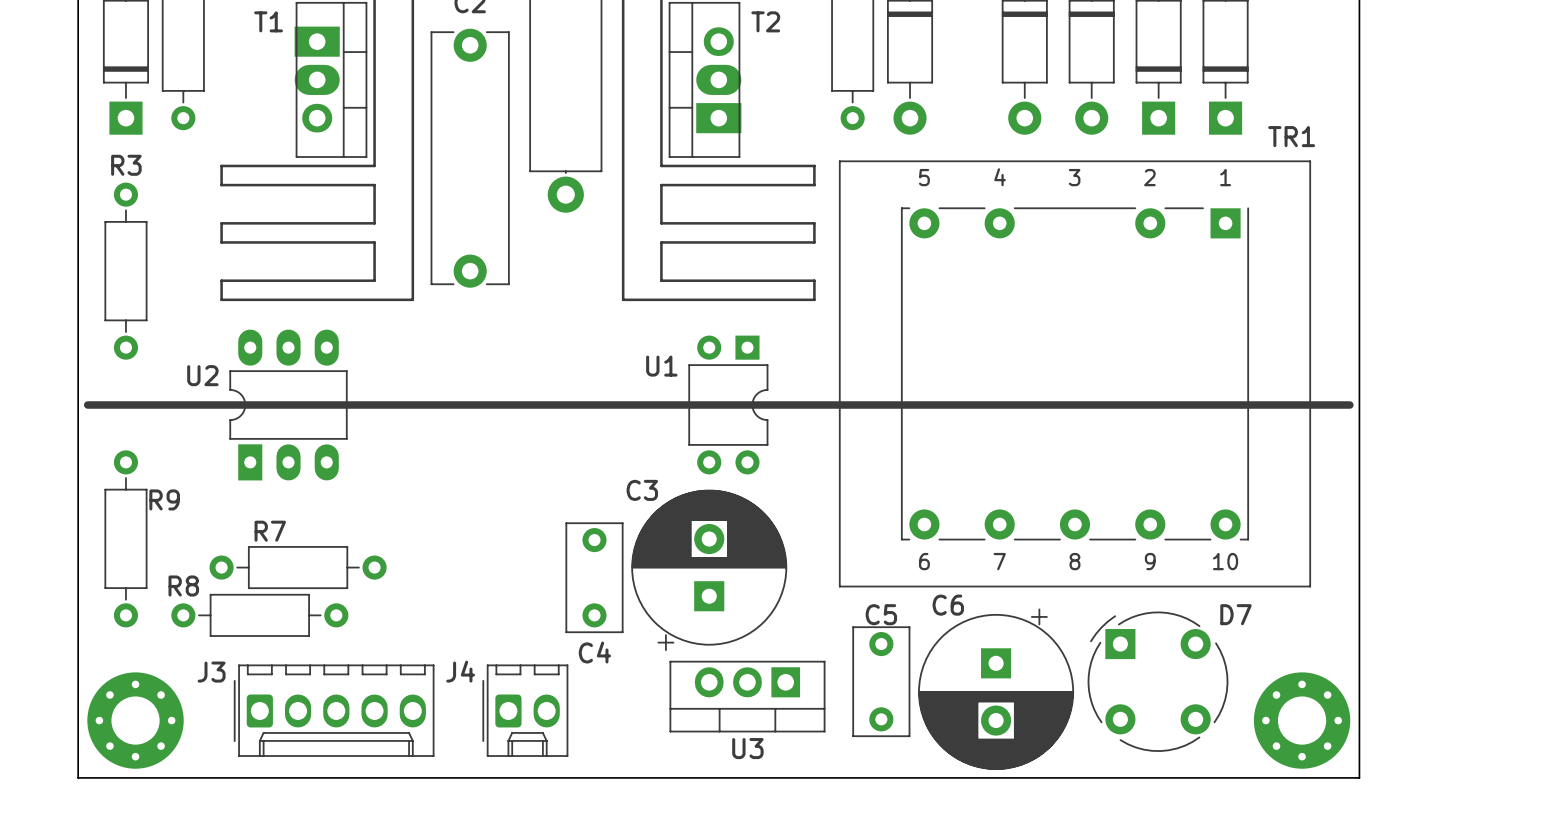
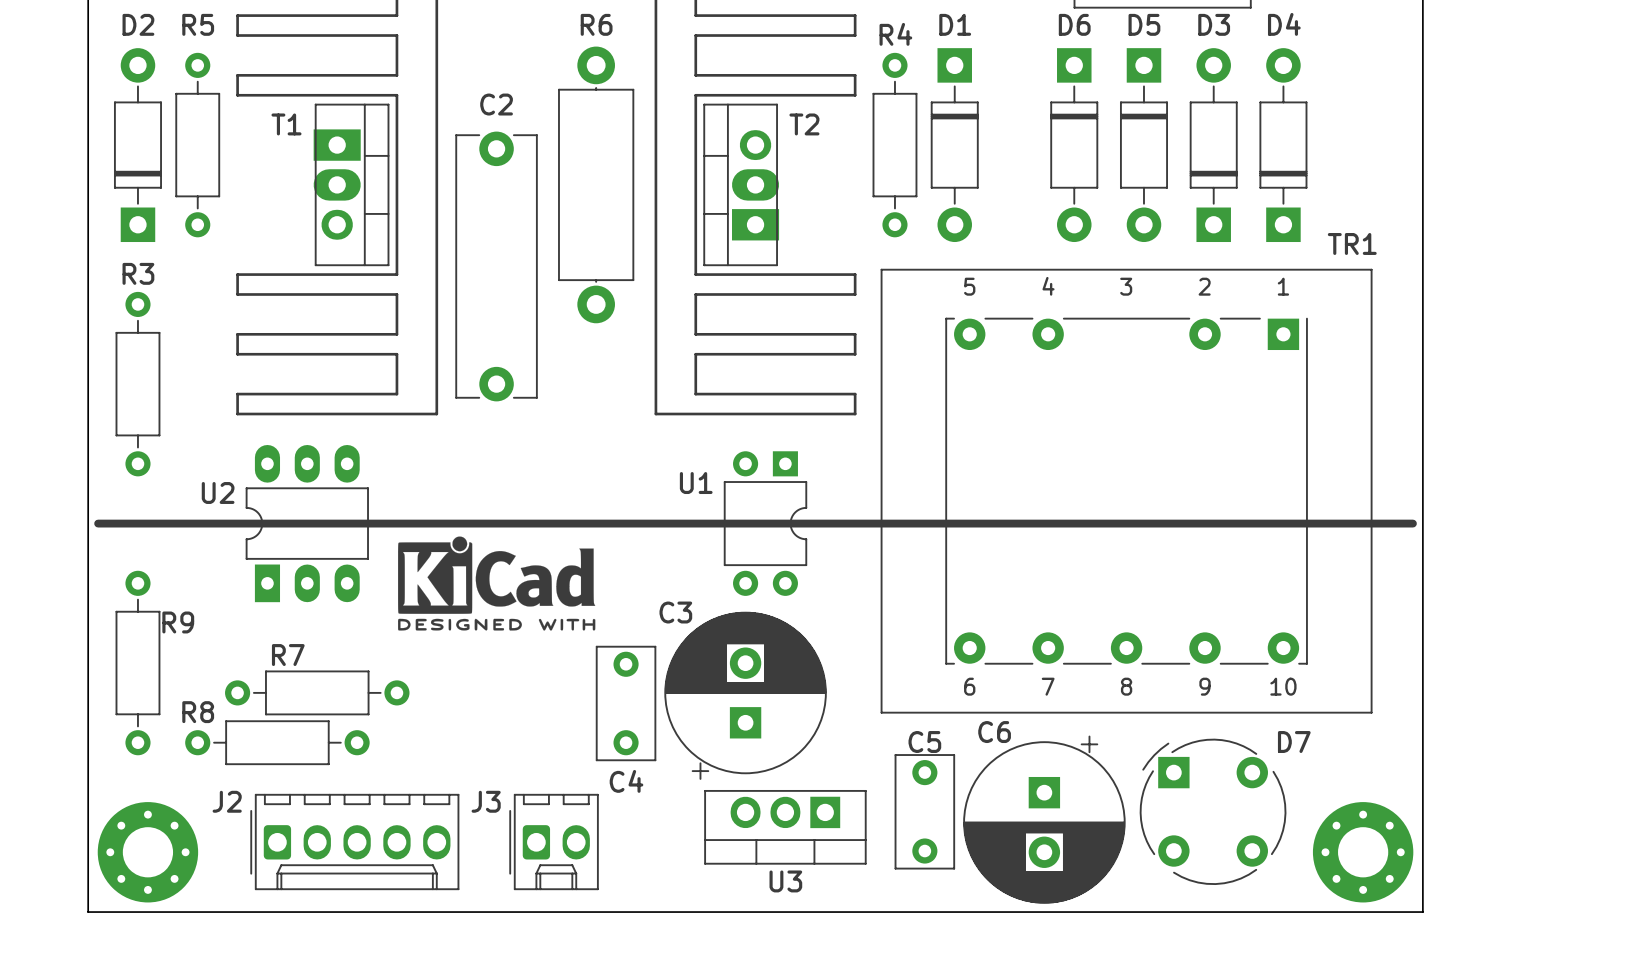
drawing: none -> [398, 536, 596, 631]
J4 name: J4 (460, 671) -> J3 (486, 801)
J3 name: J3 (211, 672) -> J2 (227, 801)

